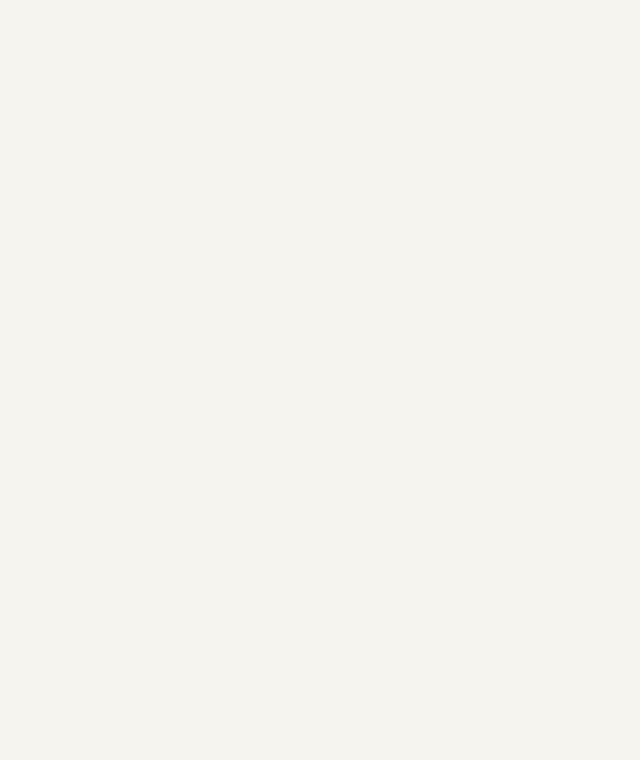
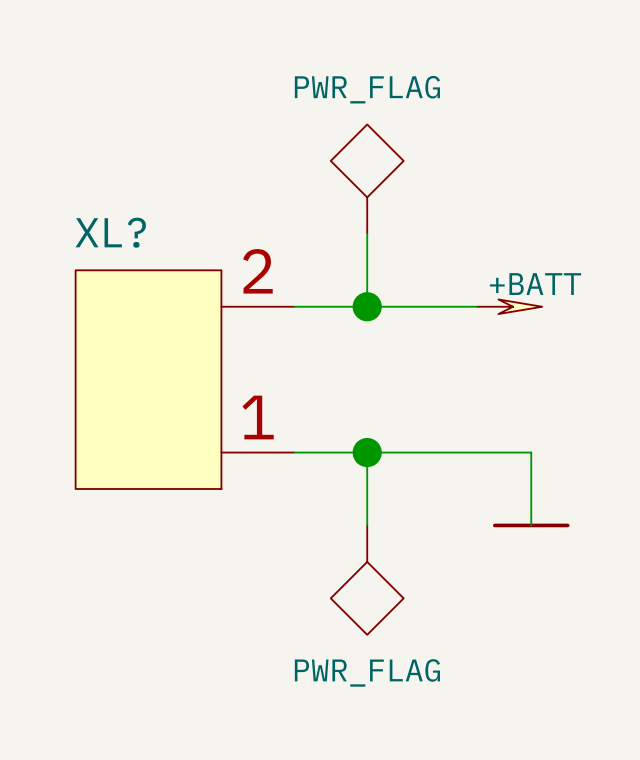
power symbol: none -> PWR_FLAG (367, 179)
wire: none -> (367, 233) (367, 306)
wire: none -> (294, 306) (476, 306)
junction: none -> (367, 306)
power symbol: none -> +BATT (509, 306)
XL?: none -> (184, 379)
wire: none -> (294, 452) (531, 452) (531, 525)
wire: none -> (367, 452) (367, 525)
junction: none -> (367, 452)
power symbol: none -> (531, 525)
power symbol: none -> PWR_FLAG (367, 580)

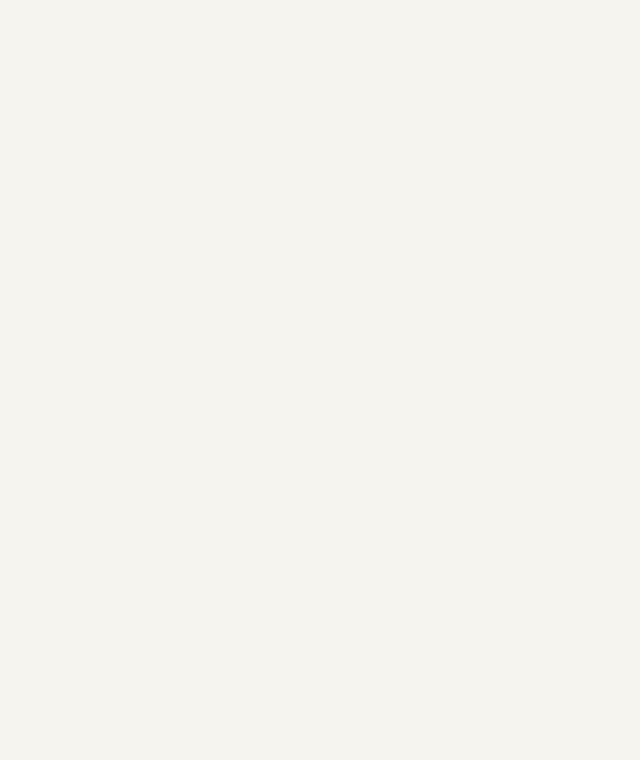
power symbol: PWR_FLAG (367, 179) -> none
wire: (367, 233) (367, 306) -> none
wire: (294, 306) (476, 306) -> none
junction: (367, 306) -> none
power symbol: +BATT (509, 306) -> none
XL?: (184, 379) -> none
wire: (294, 452) (531, 452) (531, 525) -> none
wire: (367, 452) (367, 525) -> none
junction: (367, 452) -> none
power symbol: (531, 525) -> none
power symbol: PWR_FLAG (367, 580) -> none

